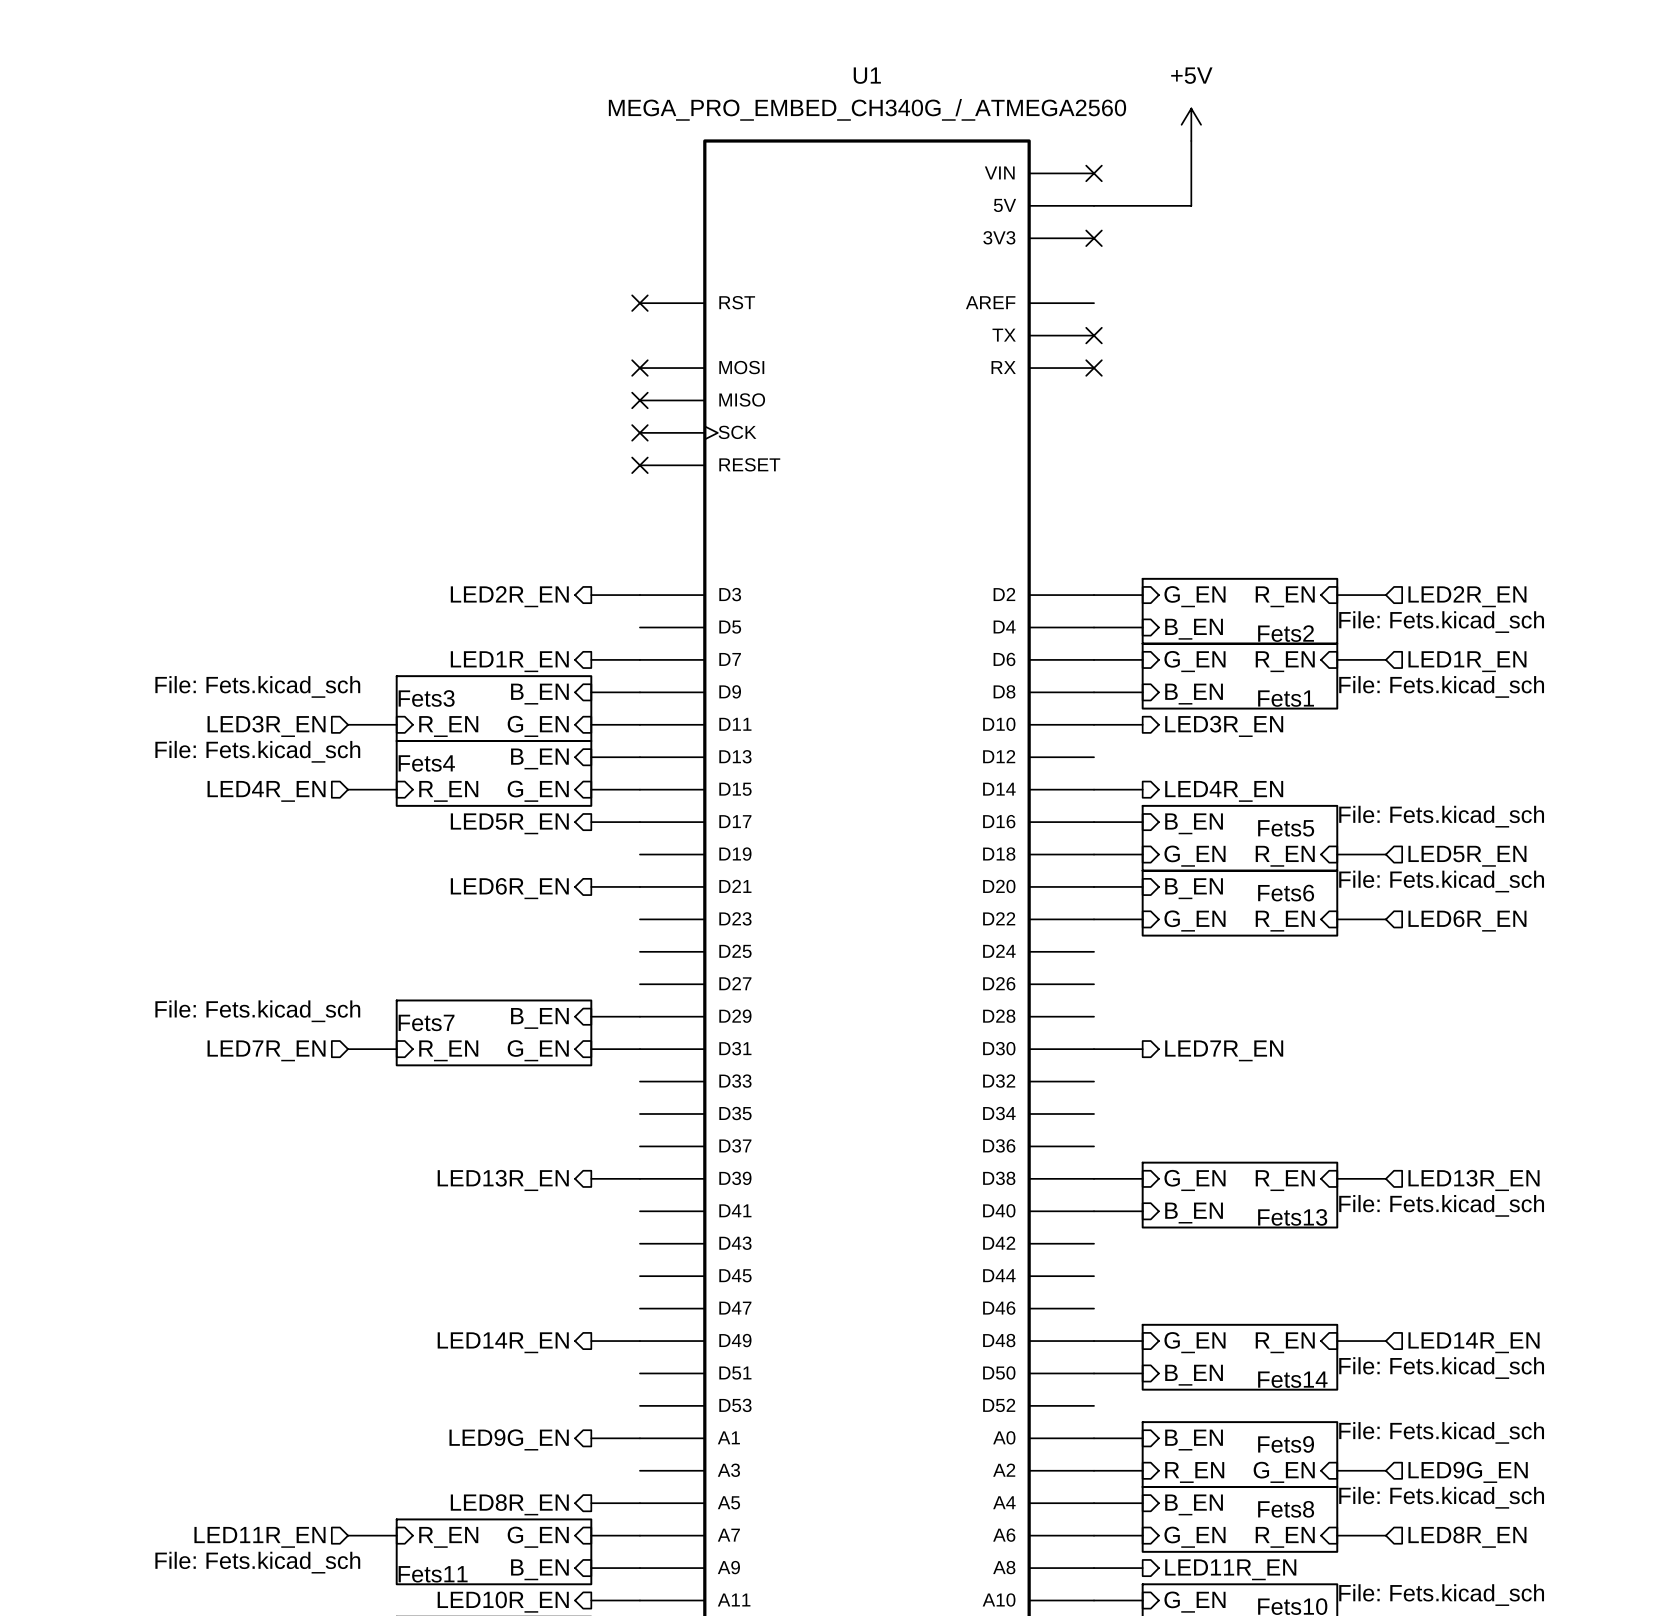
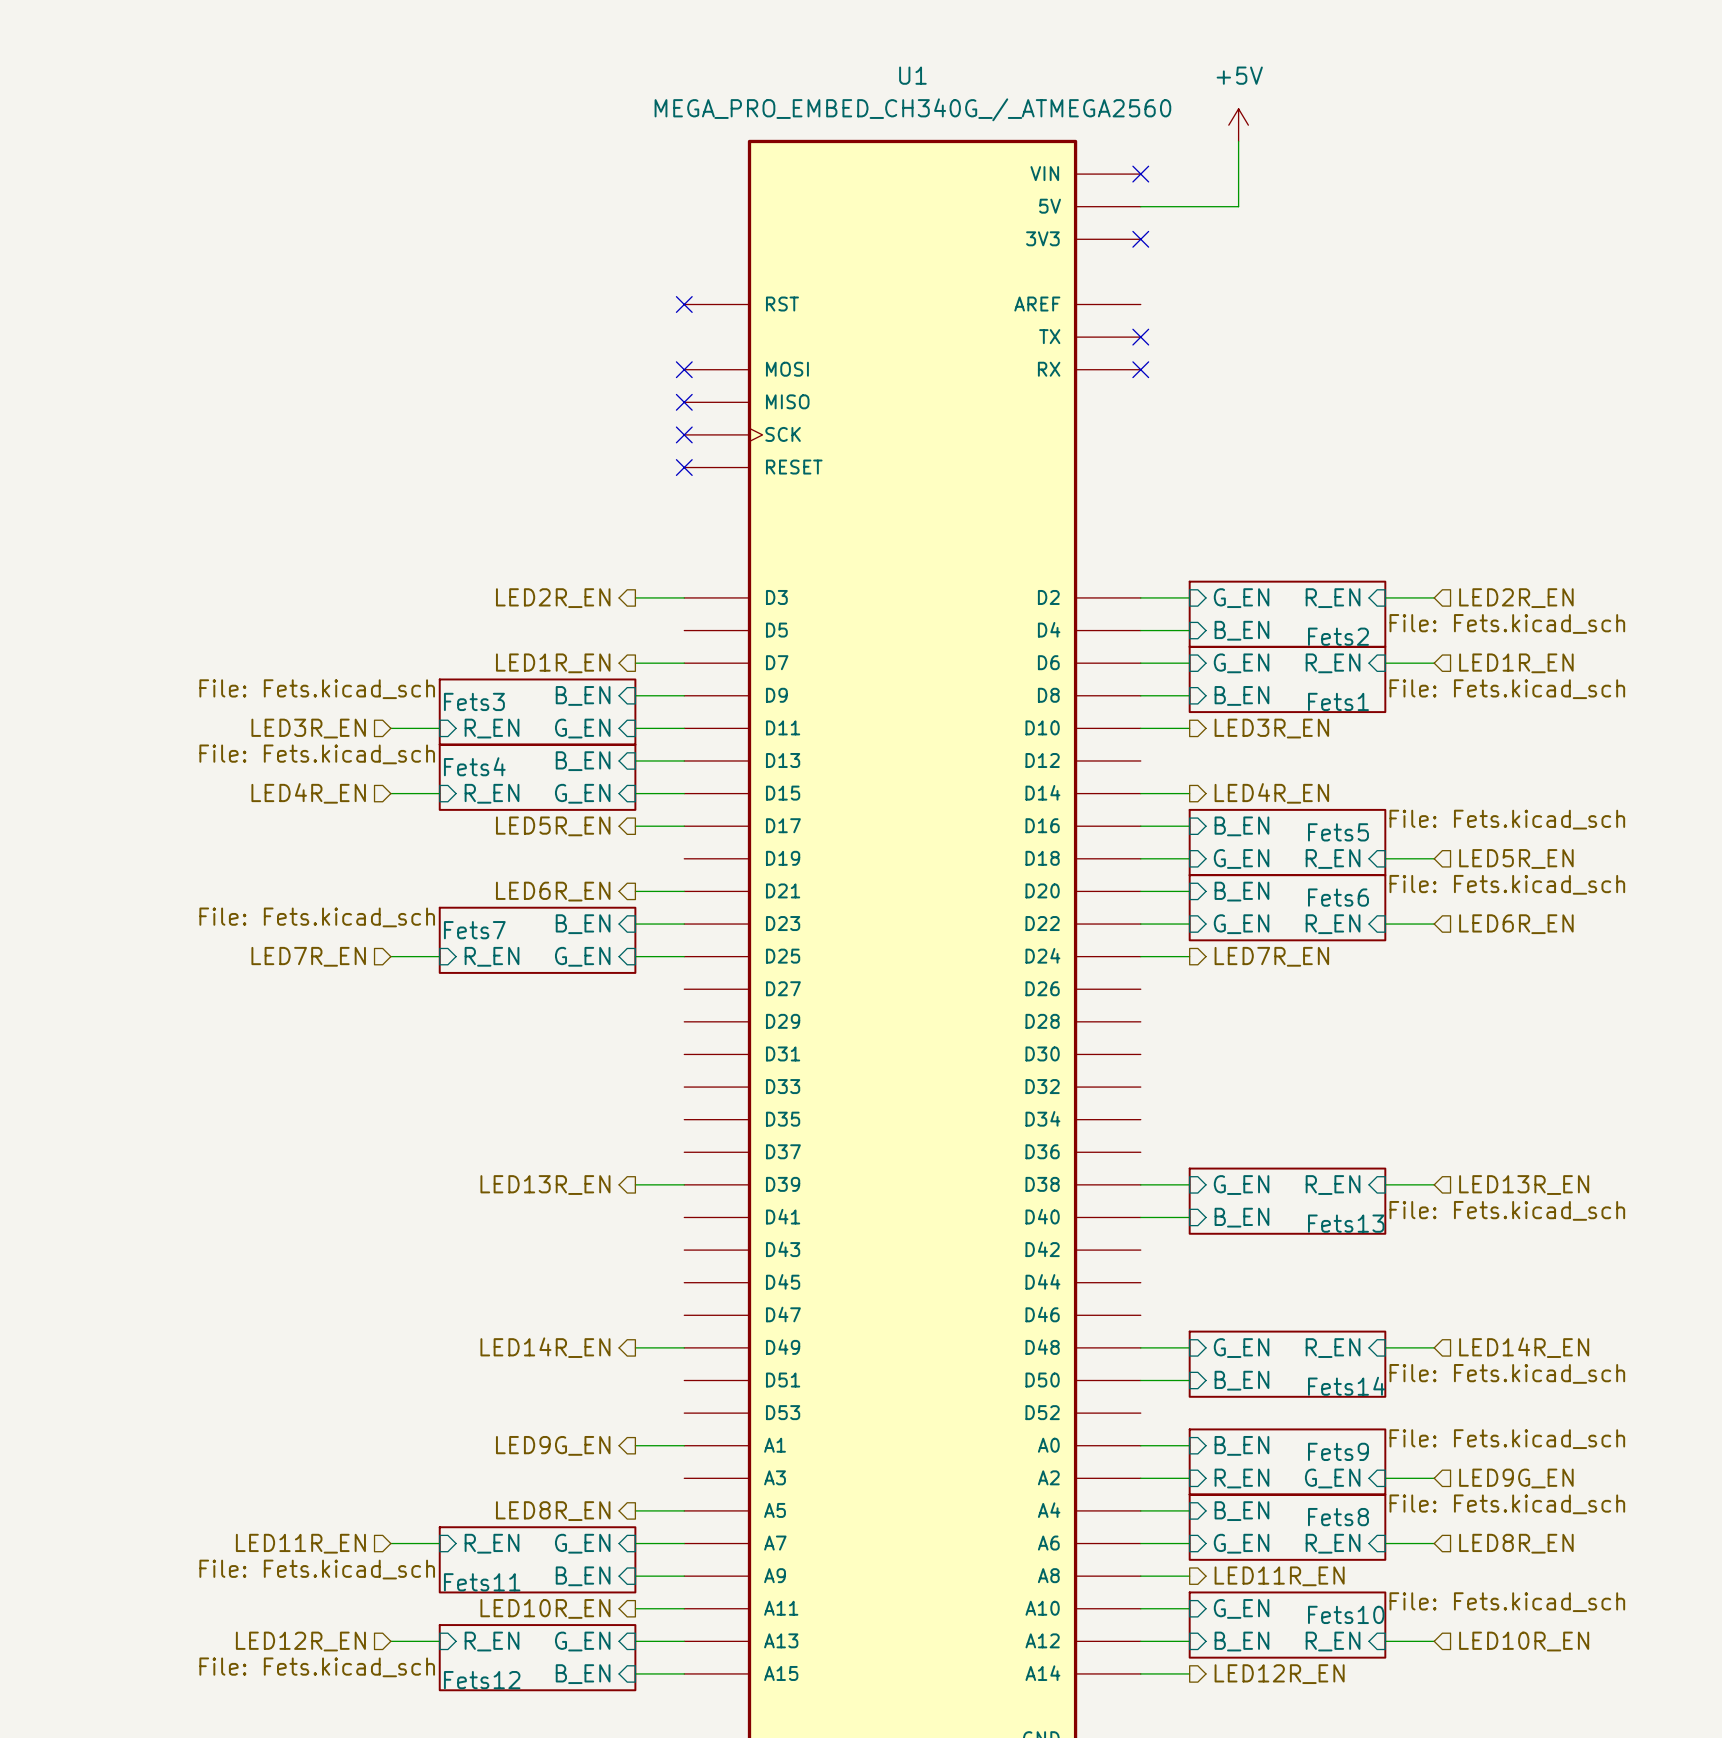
wire: (591, 1016) (639, 1016) -> (635, 956) (684, 956)
sheet pin position: B_EN (539, 1018) -> B_EN (583, 924)
sheet Fets7 position: (494, 1032) -> (537, 940)
wire: (348, 1049) (396, 1049) -> (390, 956) (439, 956)
wire: (591, 1049) (639, 1049) -> (635, 924) (684, 924)
wire: (1094, 1049) (1142, 1049) -> (1140, 956) (1189, 956)
hierarchical label position: LED7R_EN (266, 1050) -> LED7R_EN (308, 956)
sheet pin position: R_EN (448, 1050) -> R_EN (492, 956)
sheet pin position: G_EN (538, 1050) -> G_EN (582, 956)
hierarchical label position: LED7R_EN (1224, 1050) -> LED7R_EN (1271, 956)

